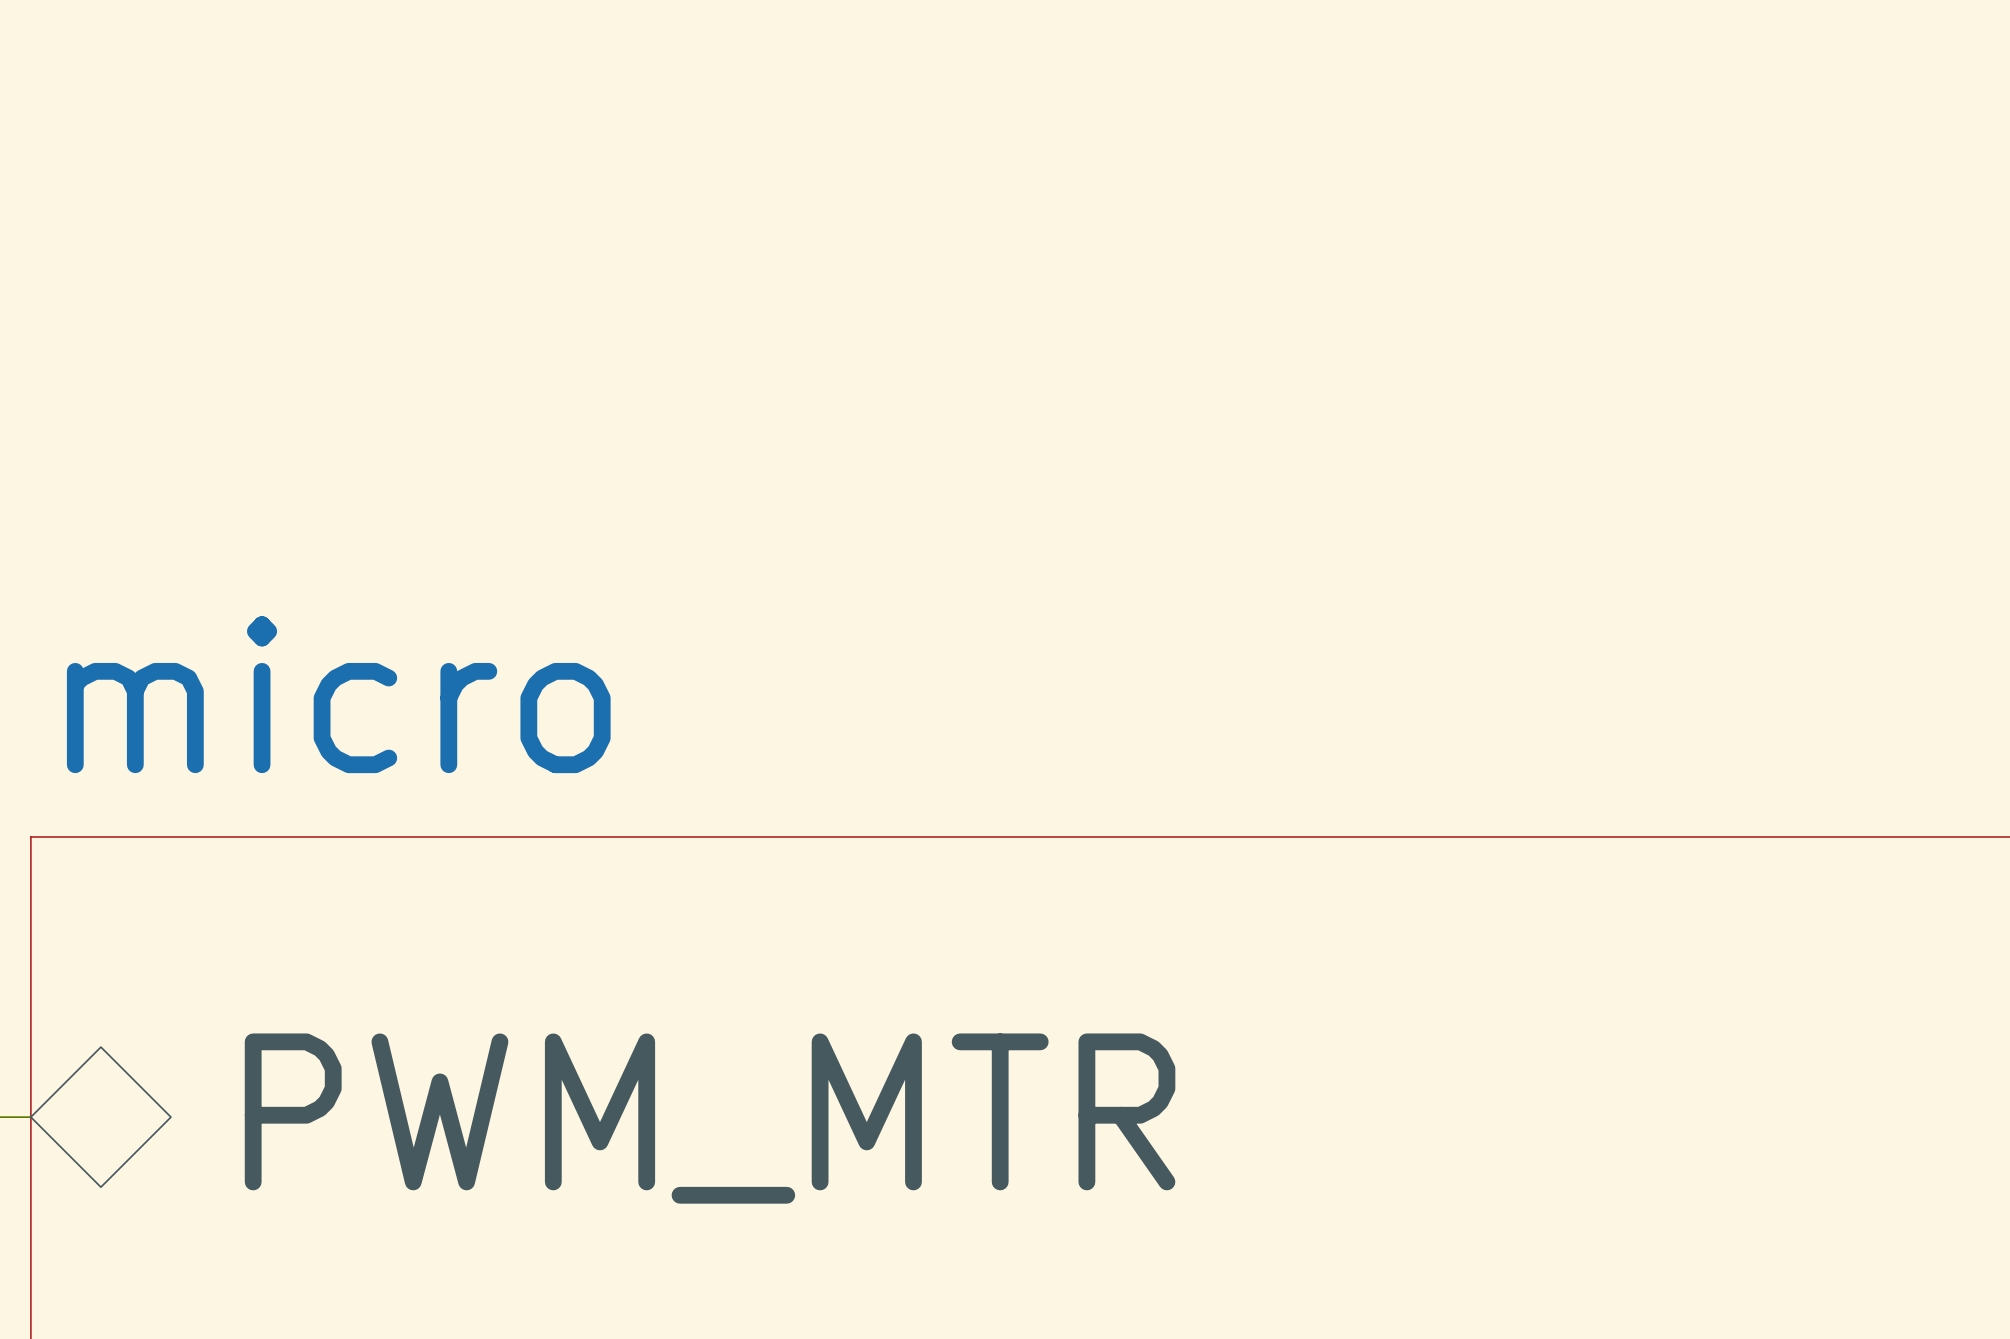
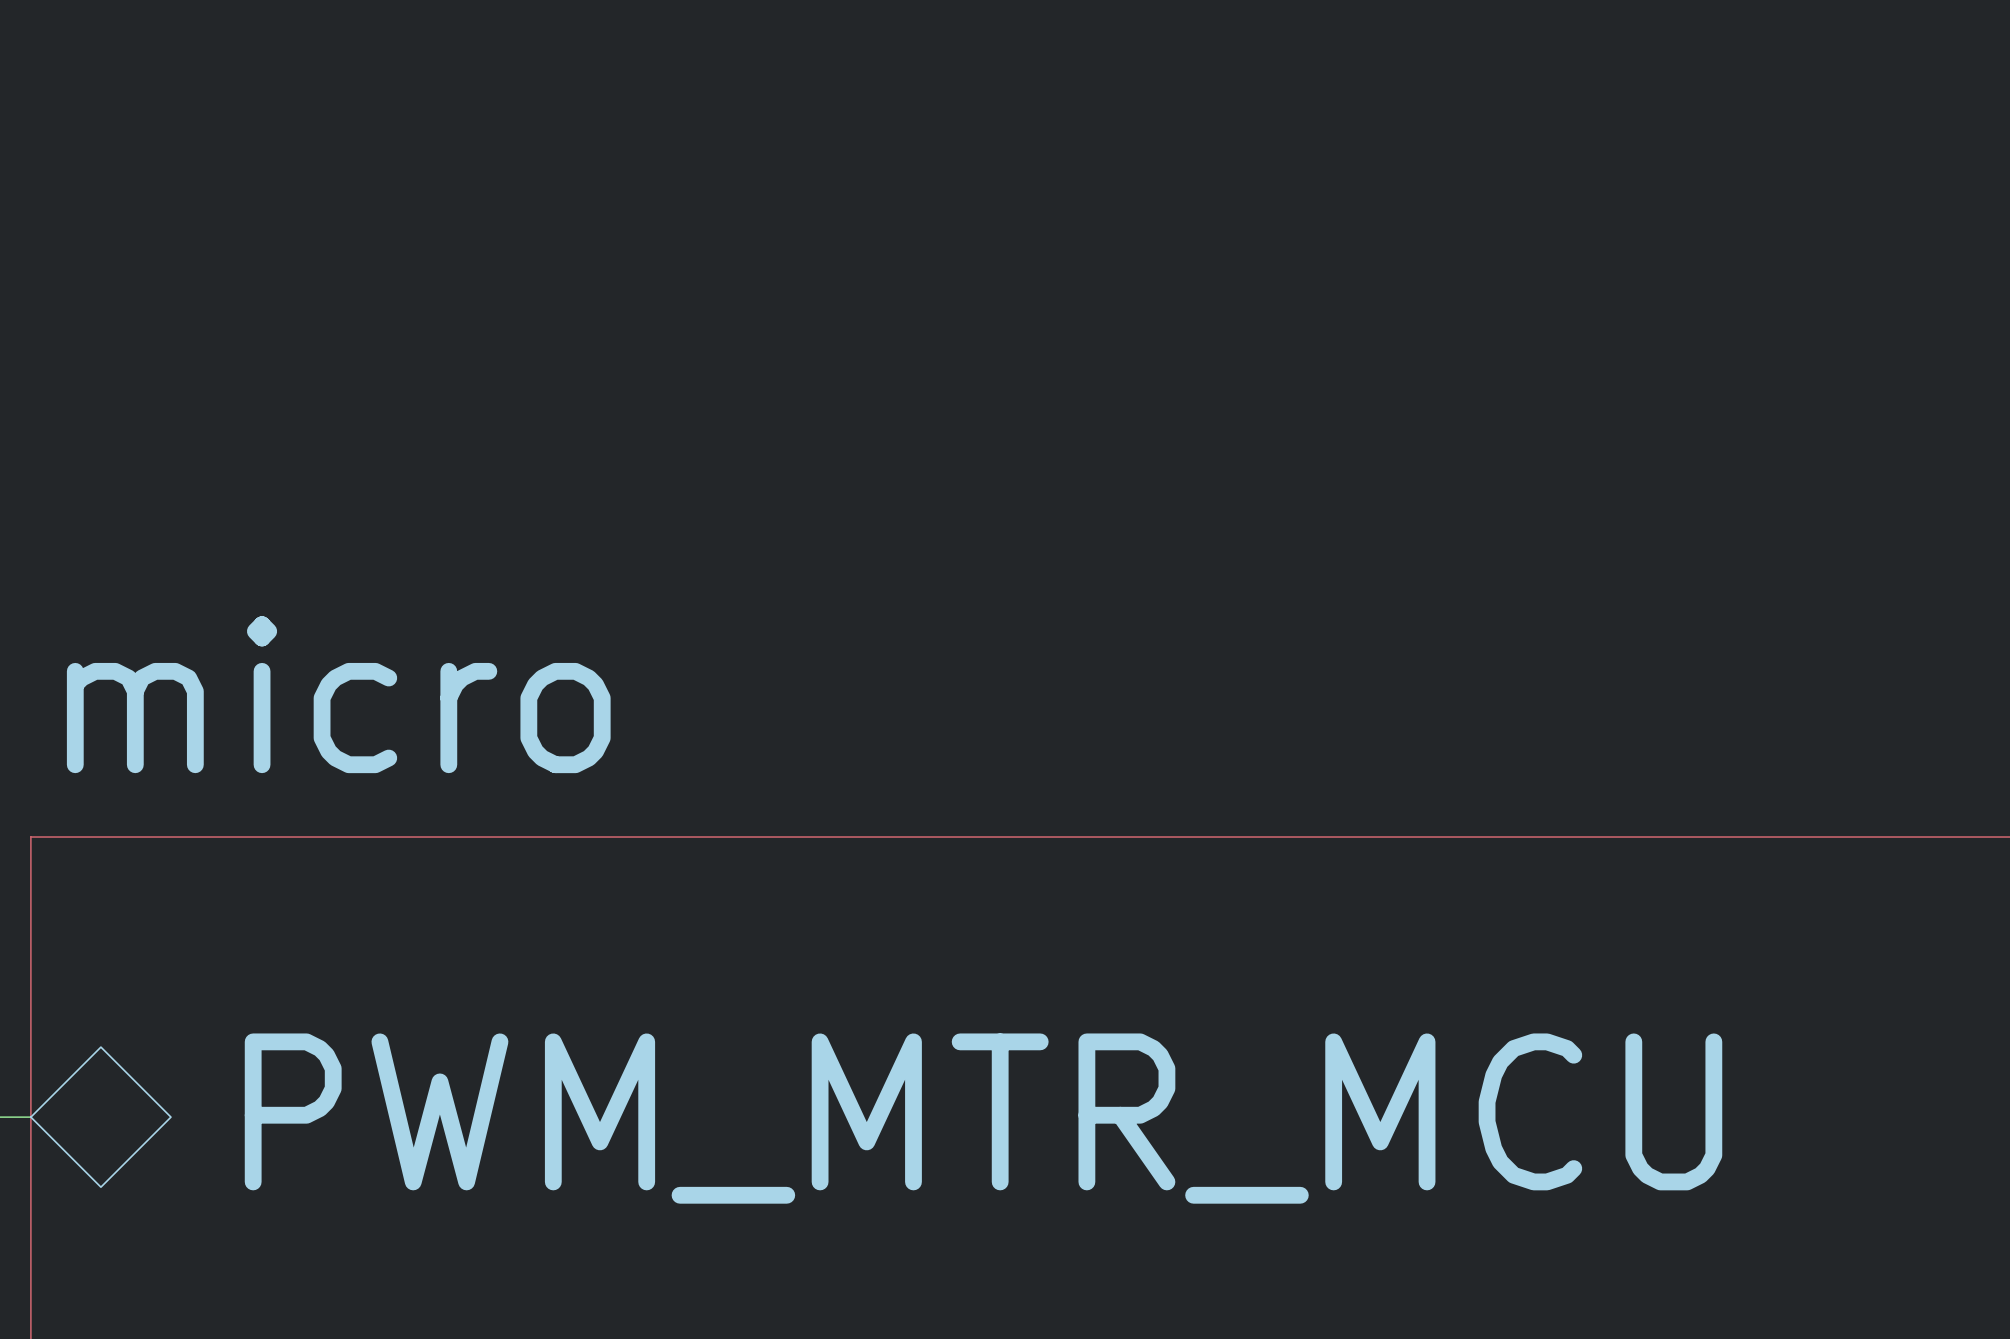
sheet pin: PWM_MTR (710, 1118) -> PWM_MTR_MCU (983, 1118)

